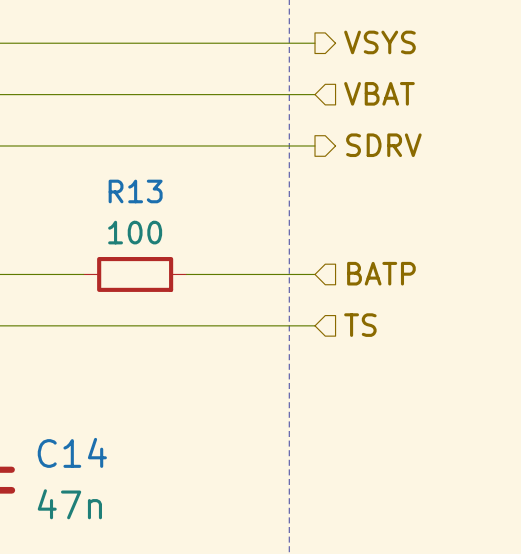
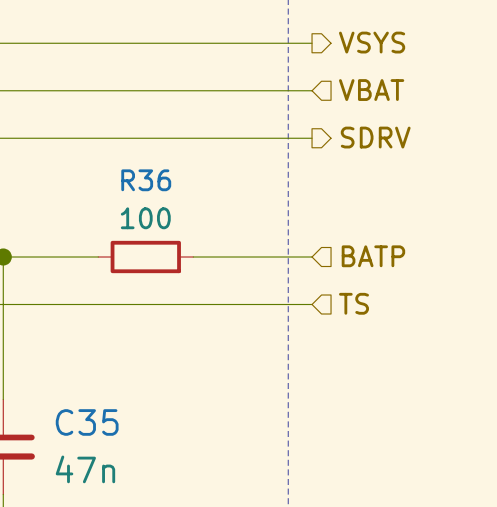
R13 name: R13 (135, 191) -> R36 (146, 180)
C14 name: C14 (72, 452) -> C35 (87, 422)

